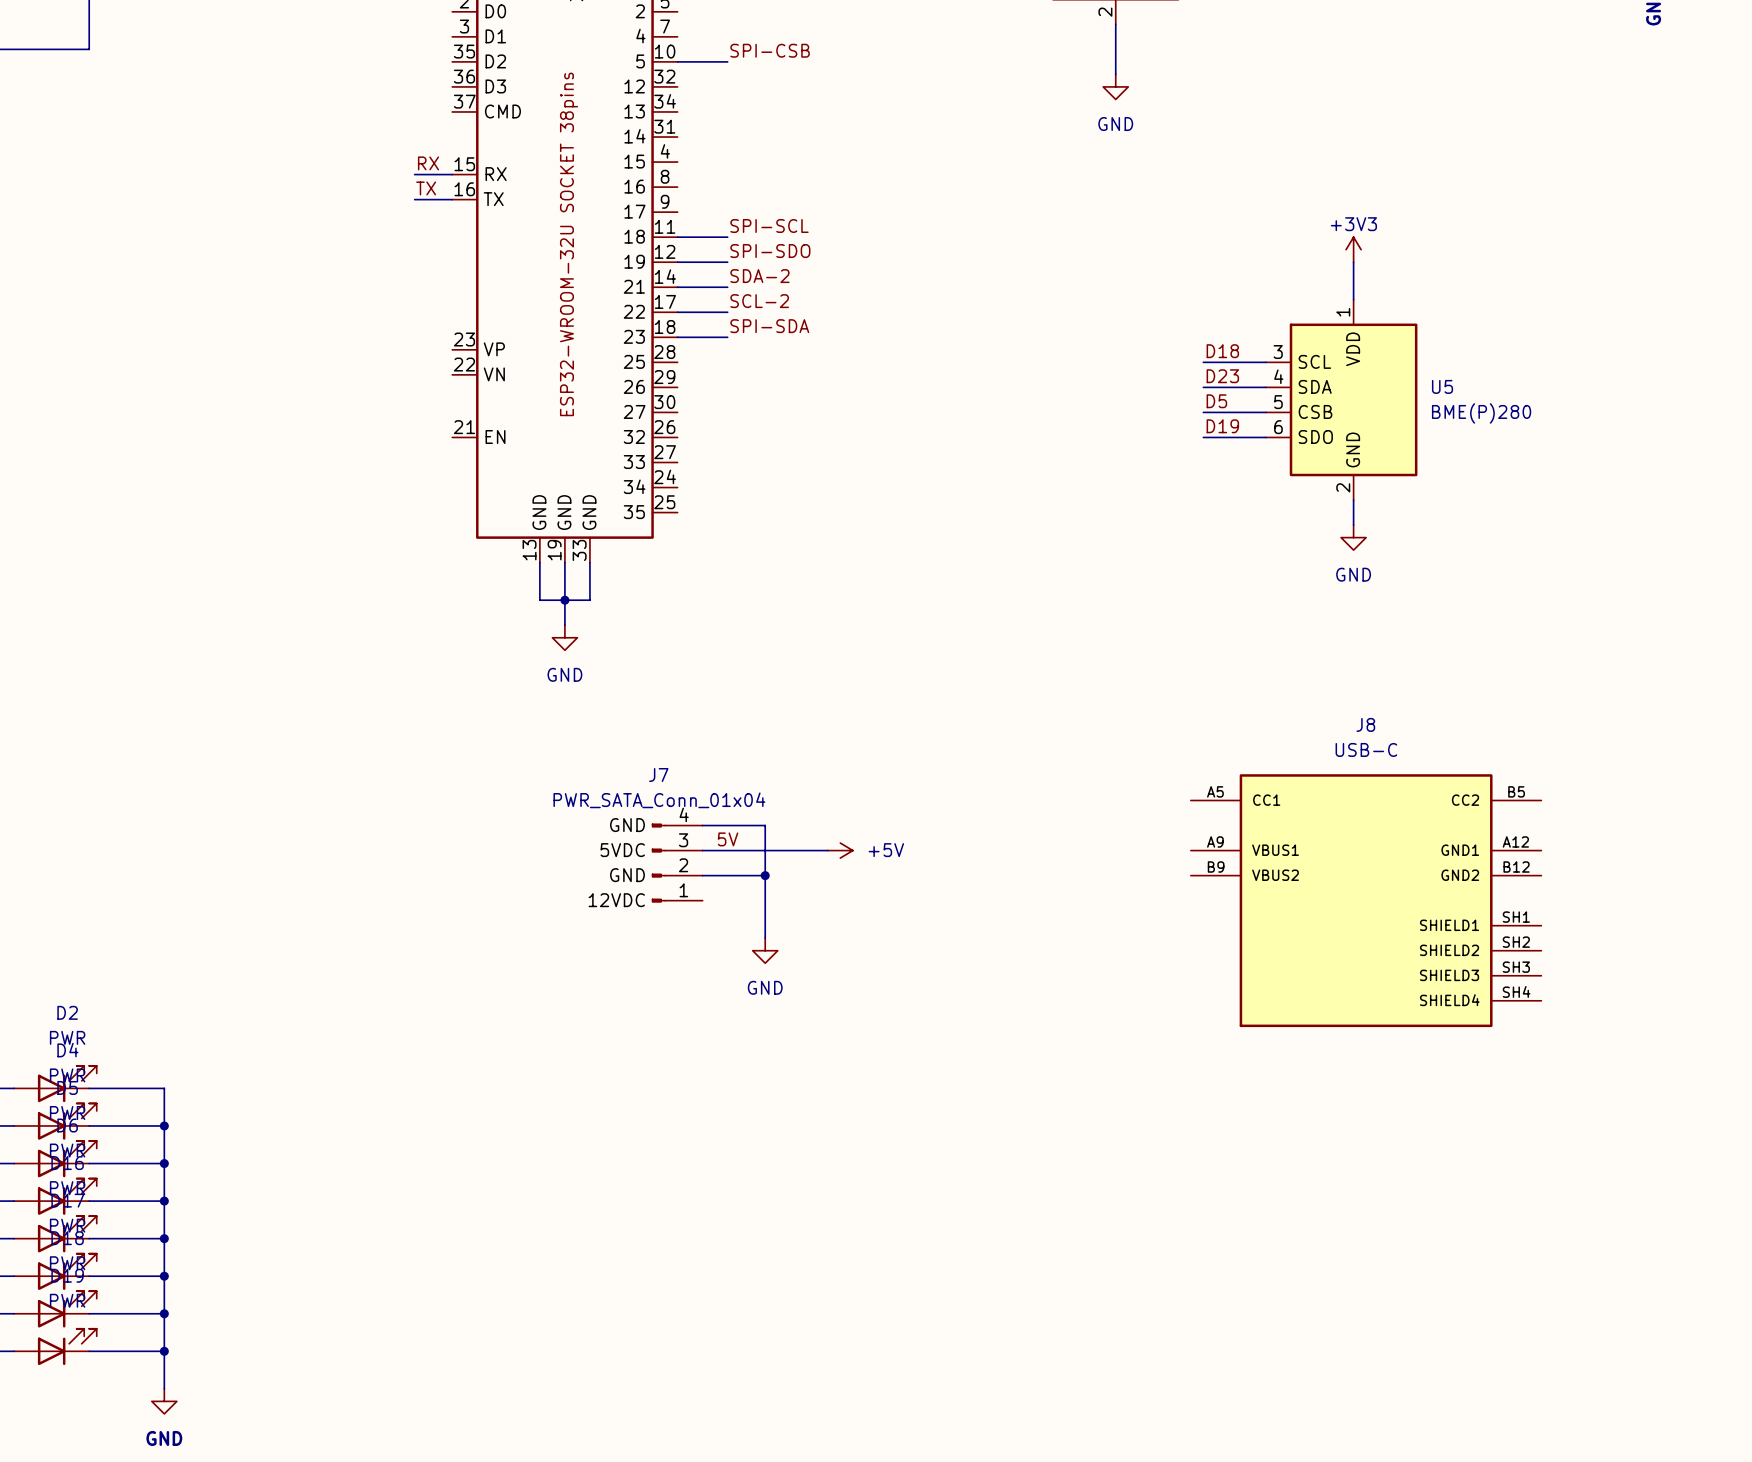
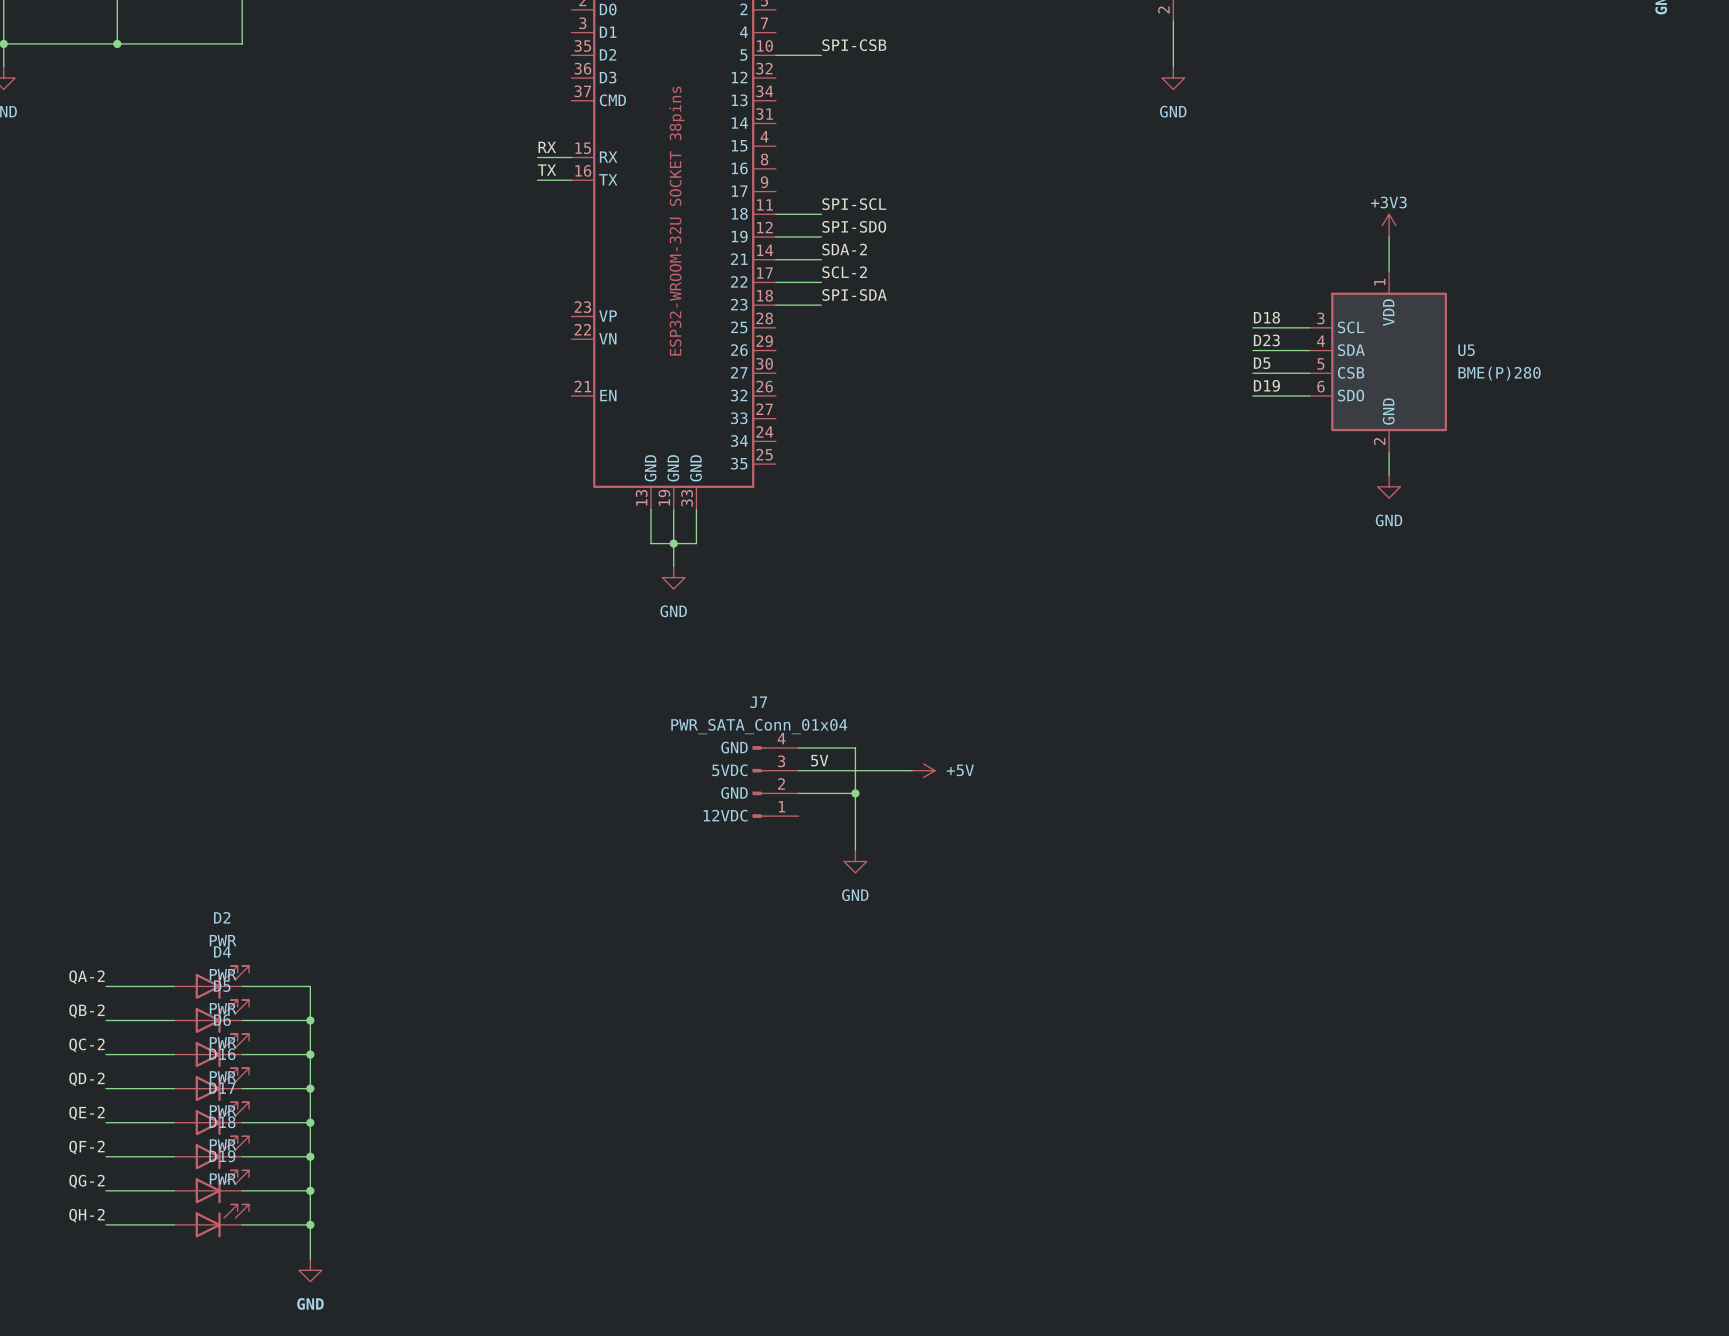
J8: USB-C (1366, 900) -> none

